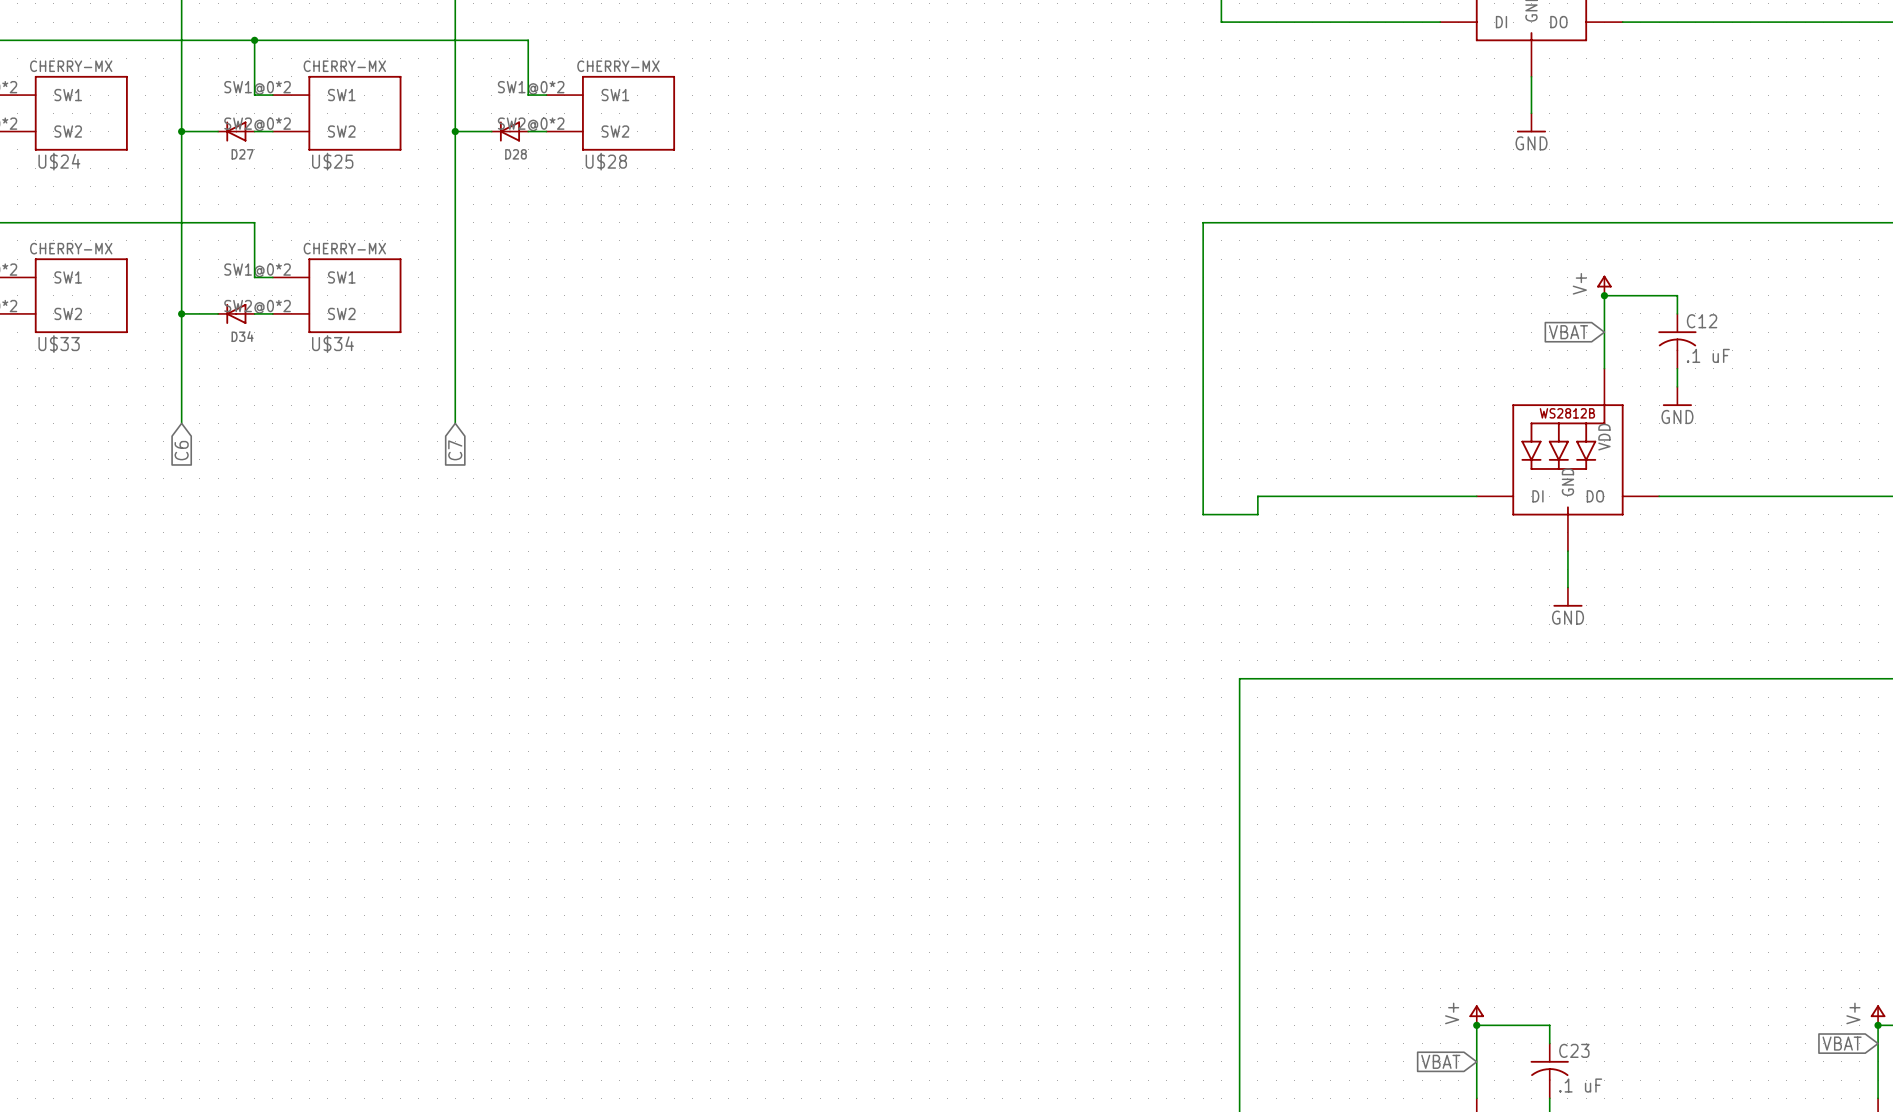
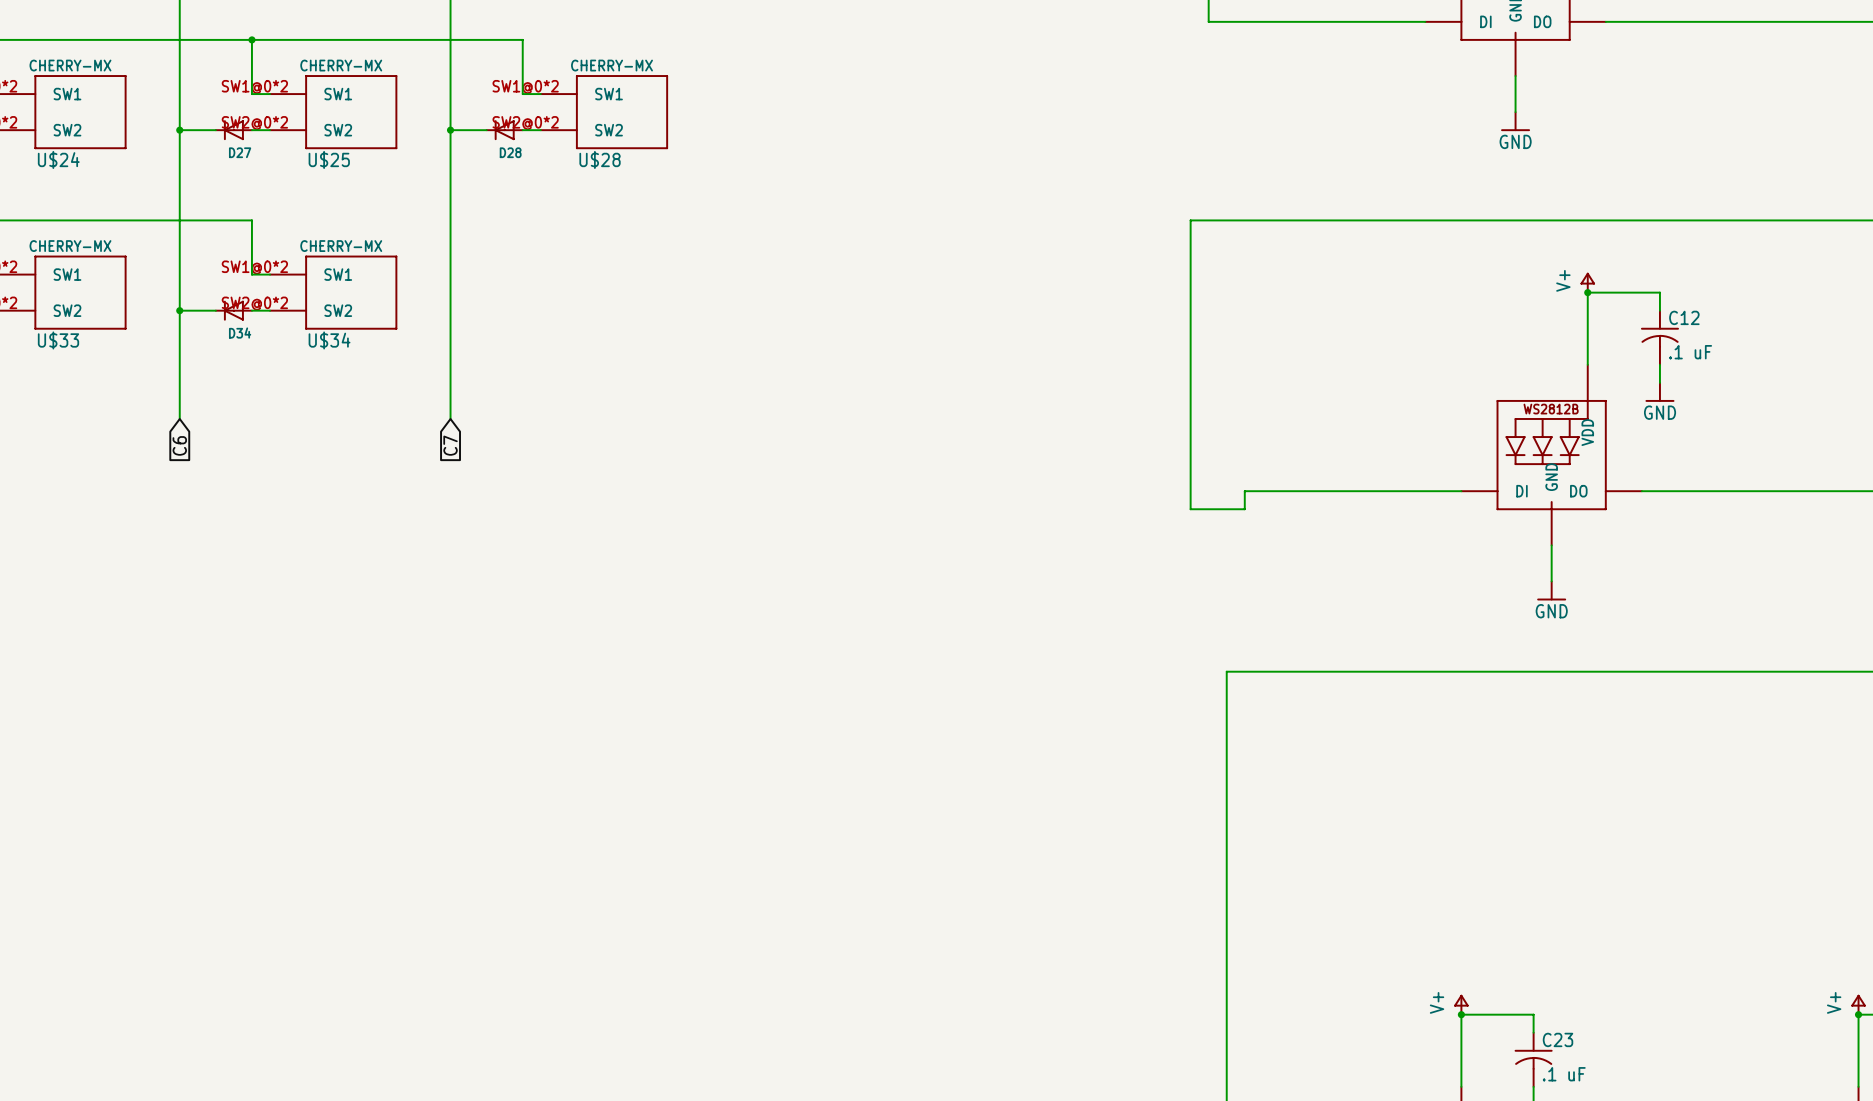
global label: VBAT (1568, 332) -> none
global label: VBAT (1842, 1043) -> none
global label: VBAT (1440, 1061) -> none

